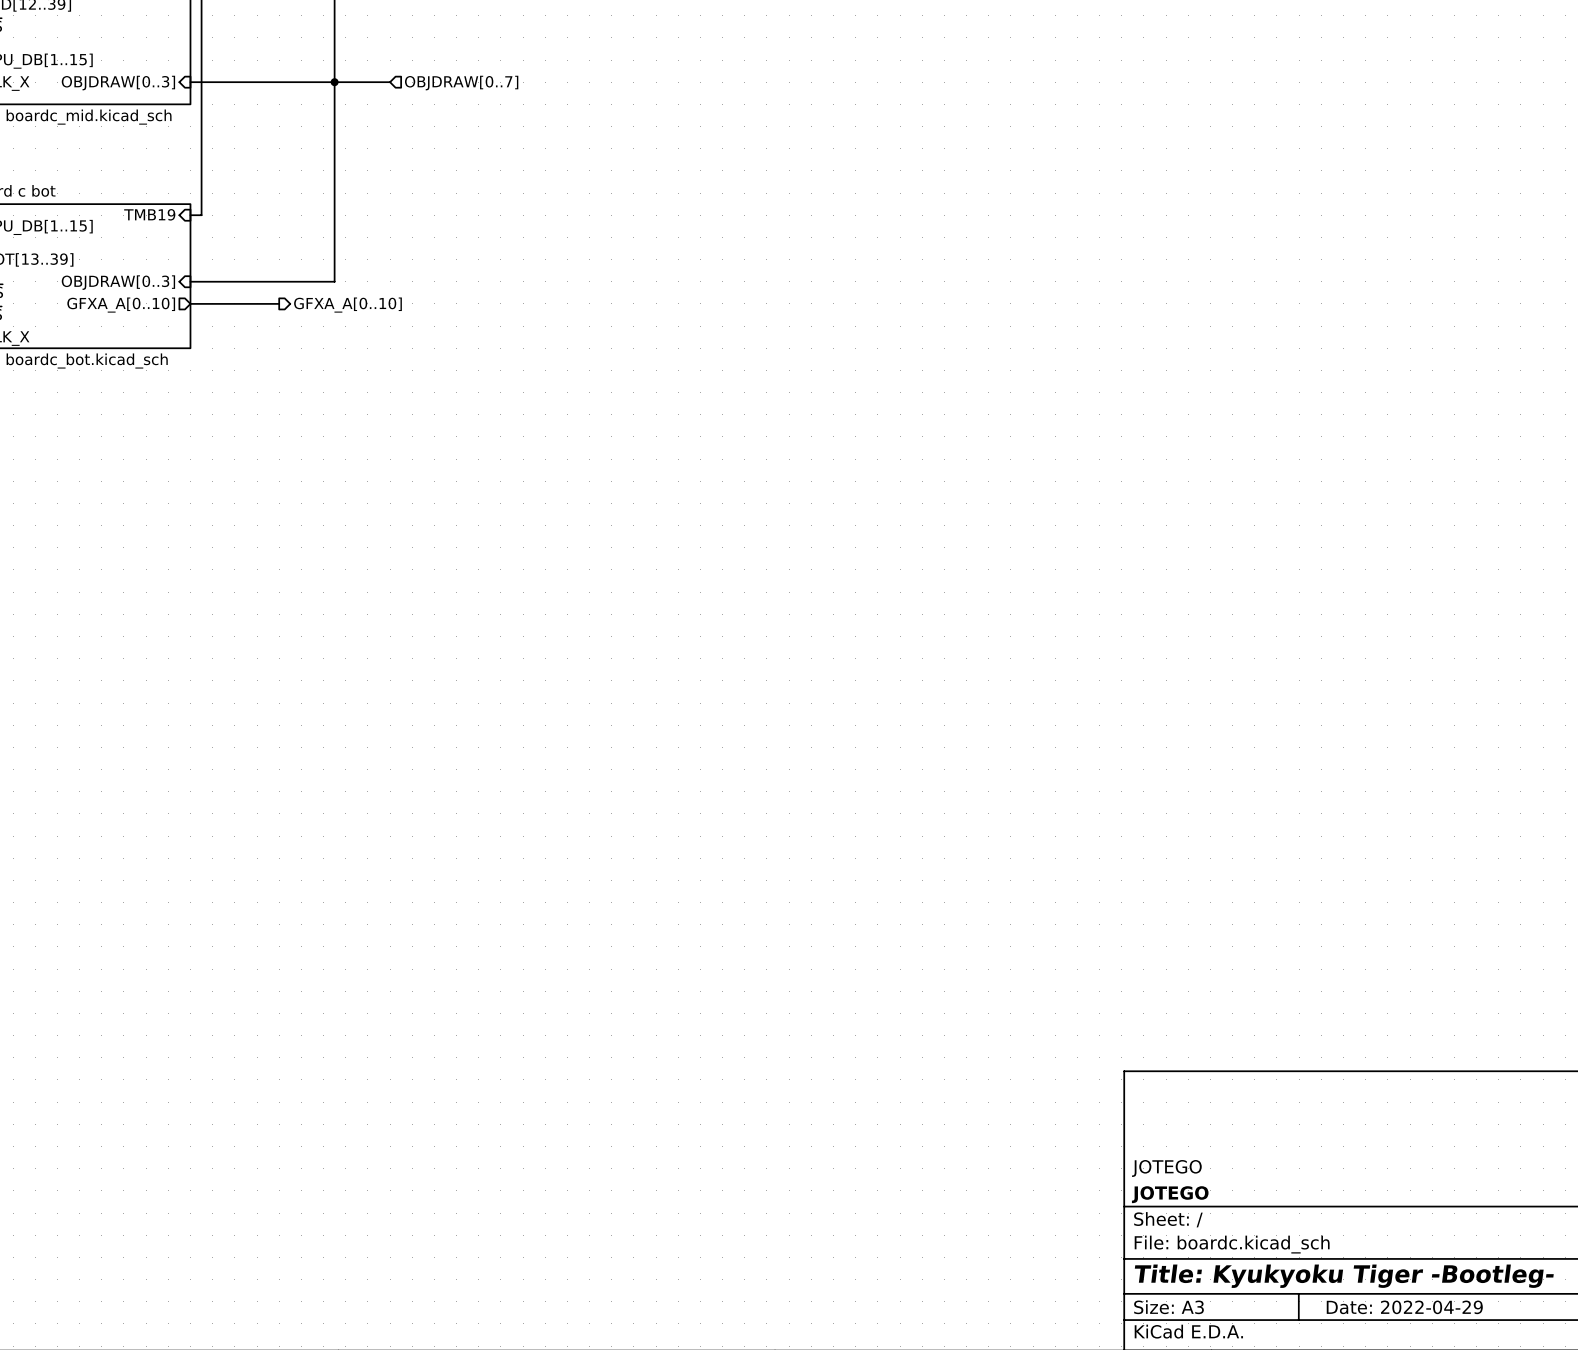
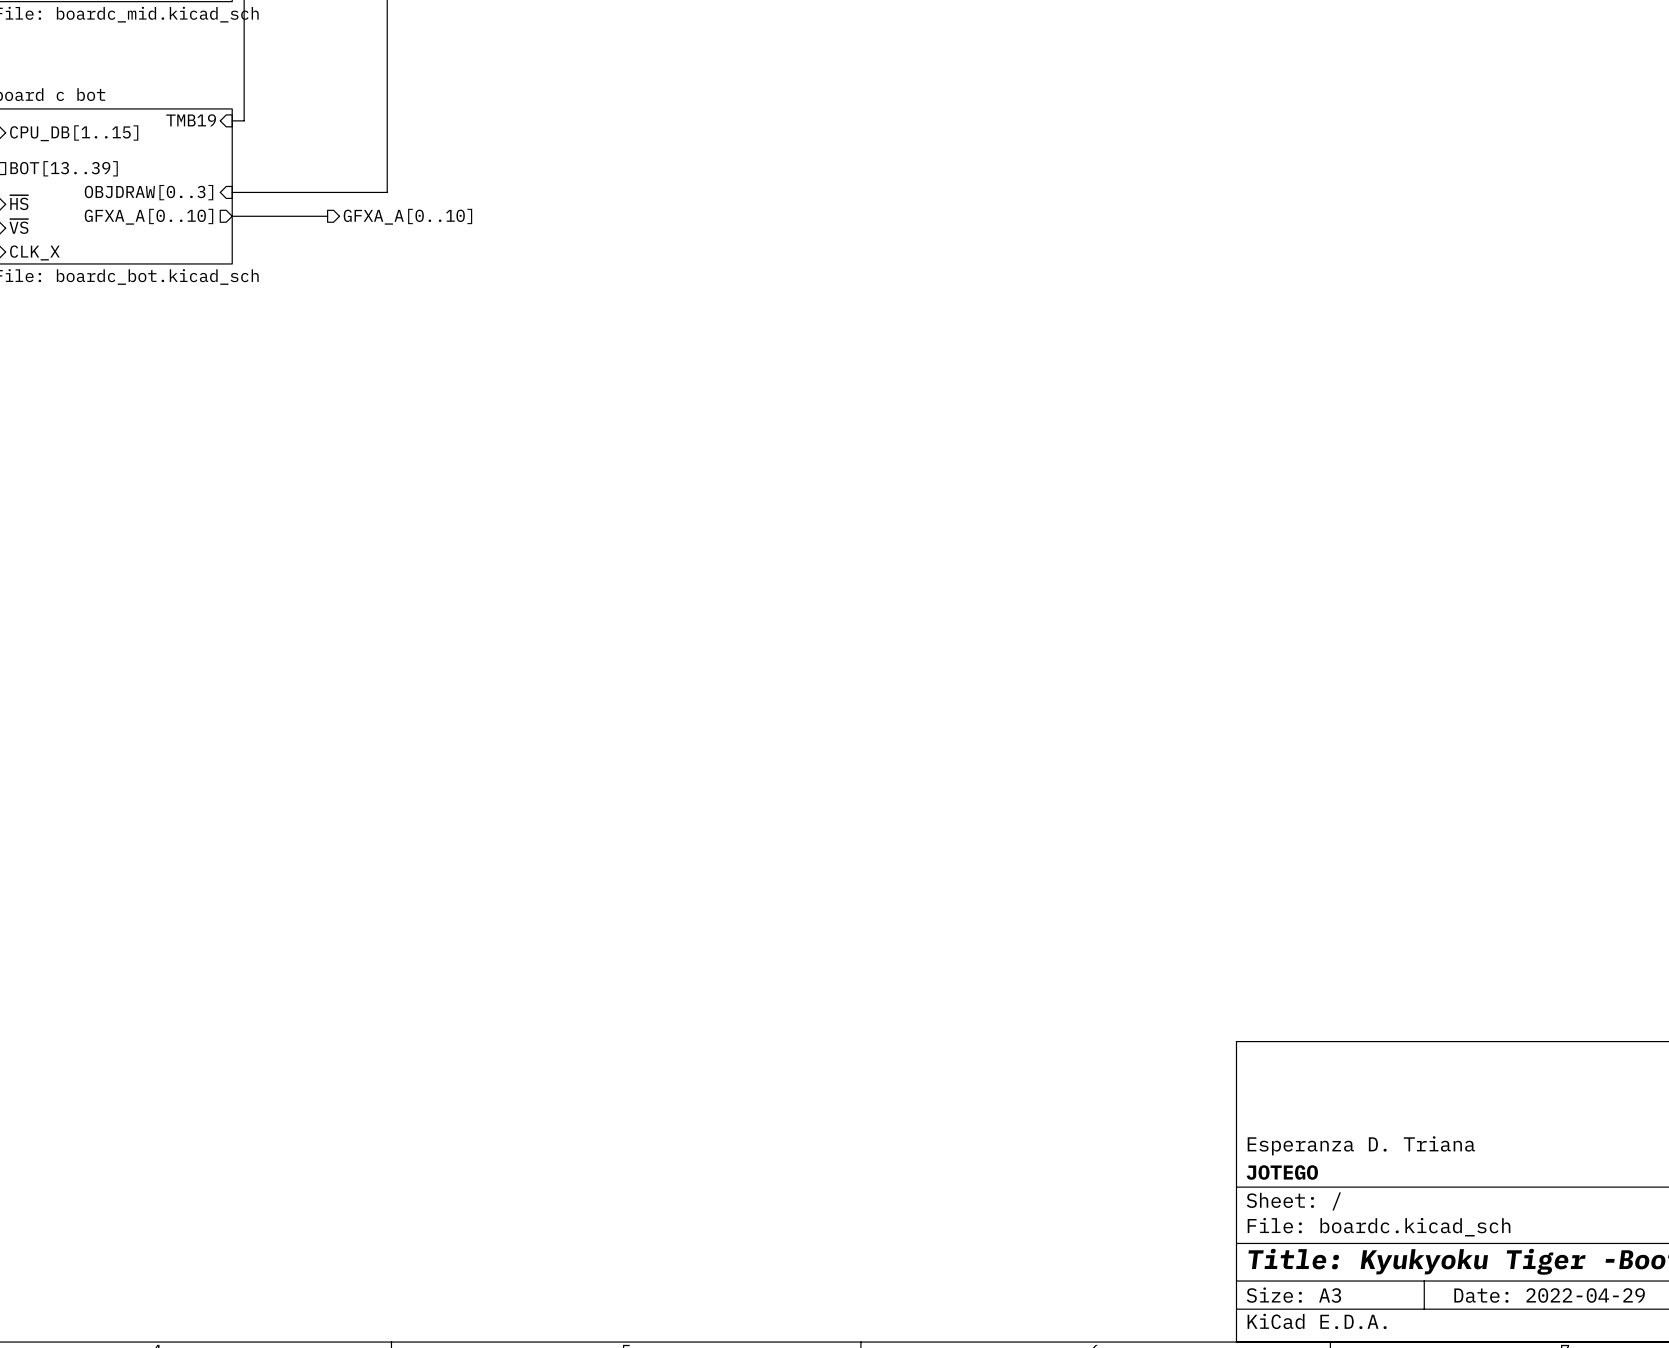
title block: JOTEGO (1166, 1168) -> Esperanza D. Triana (1361, 1145)

